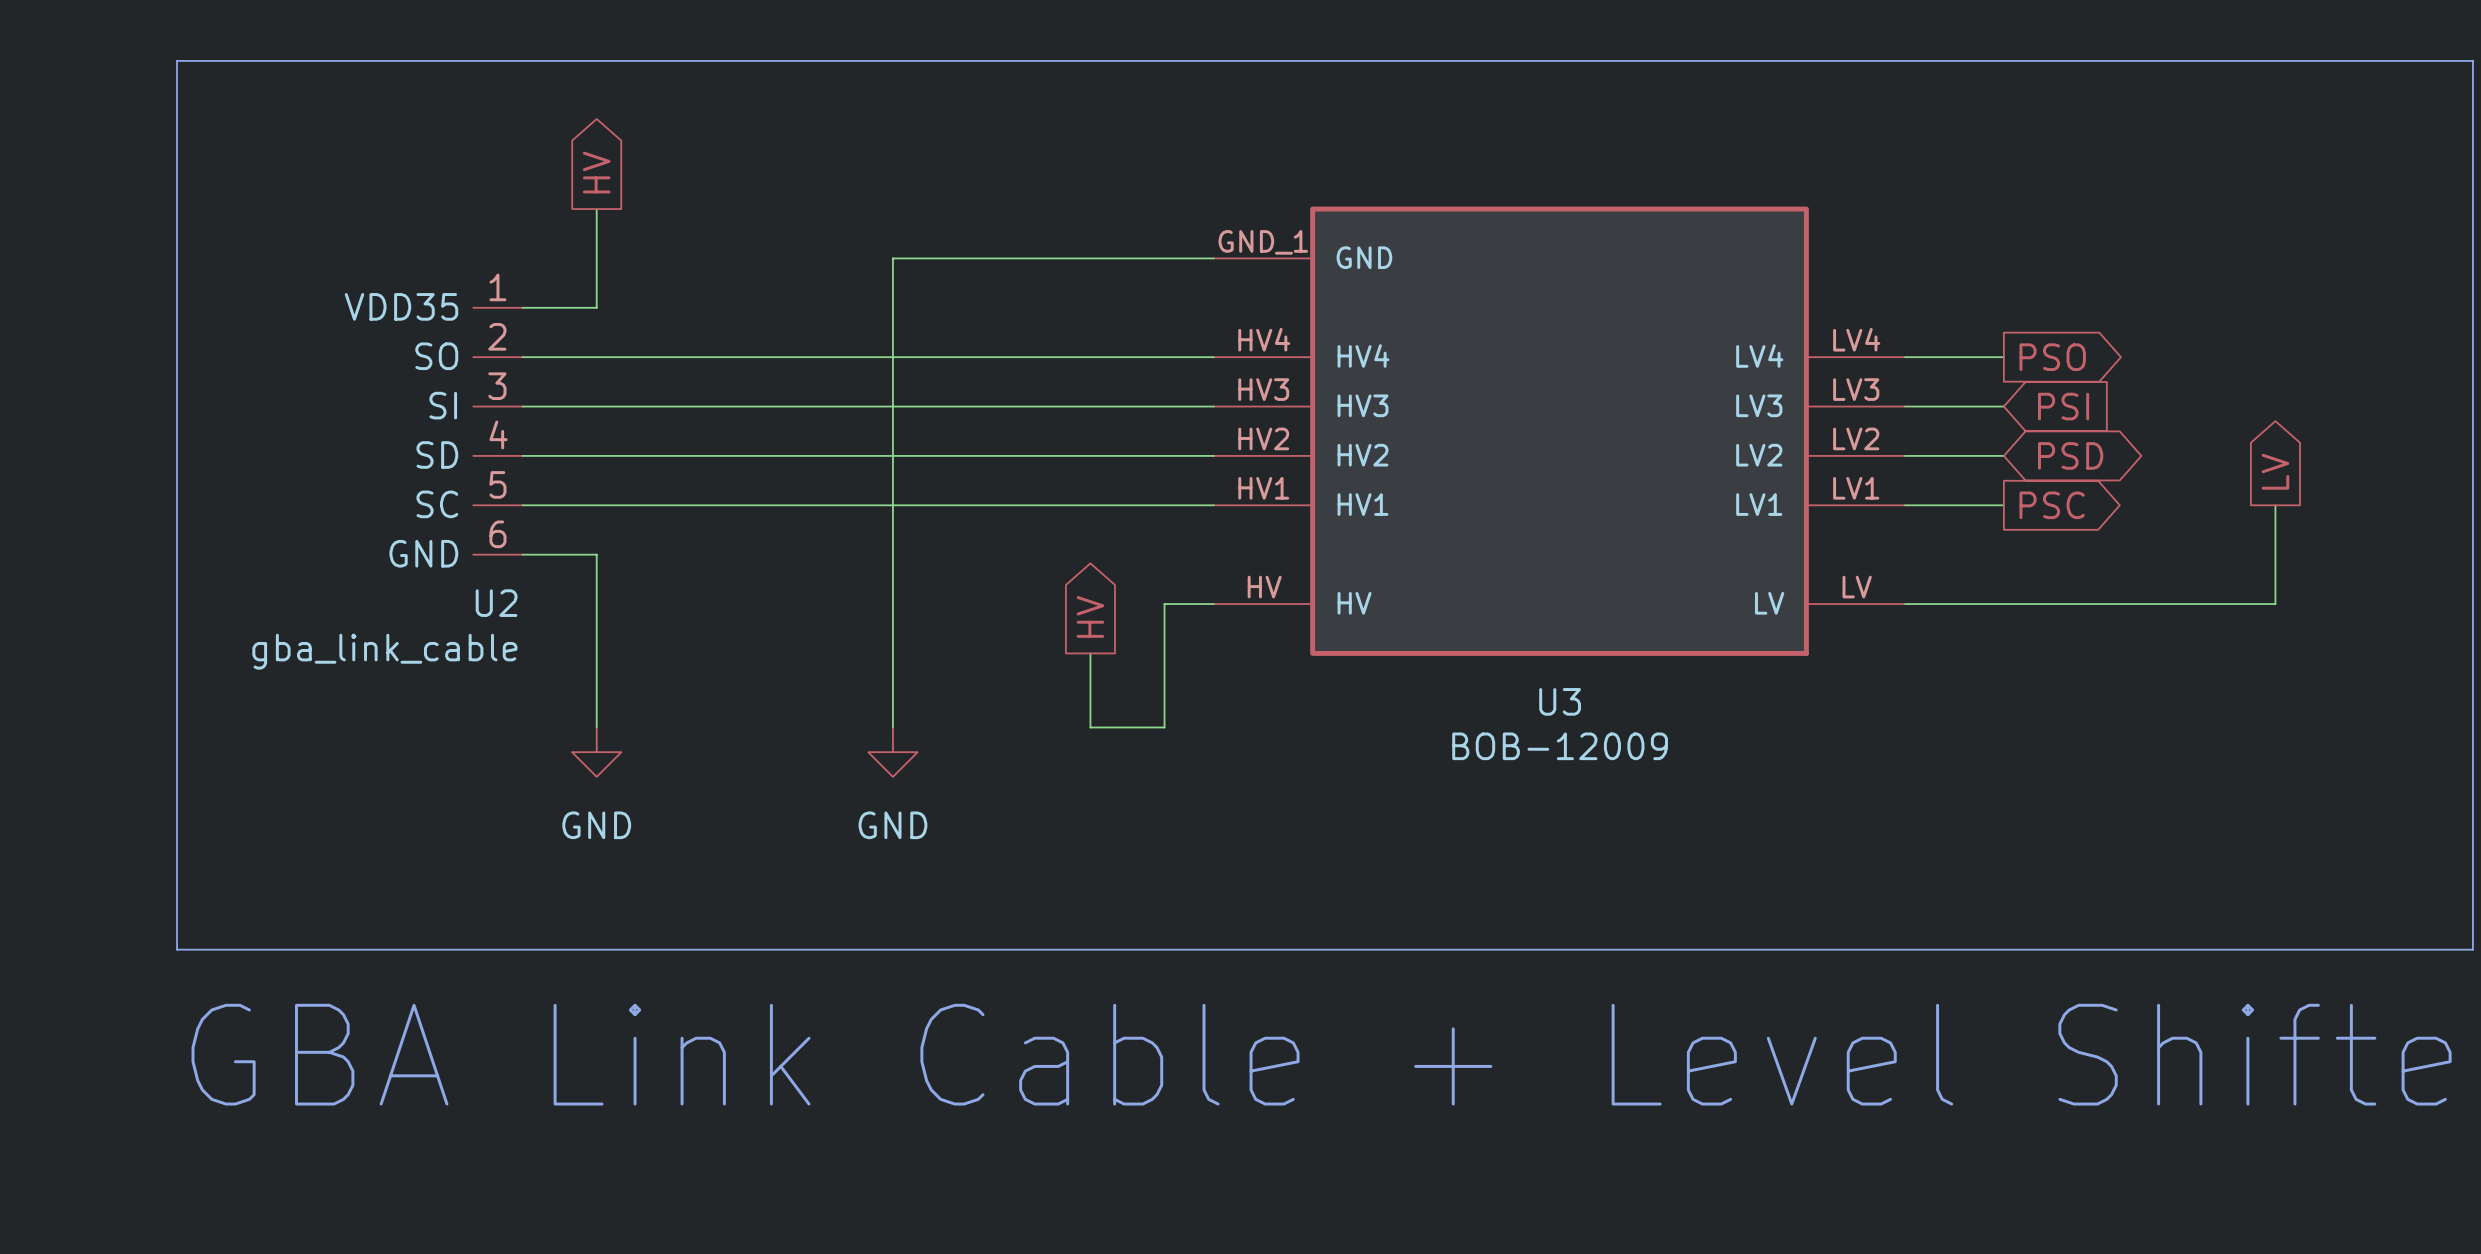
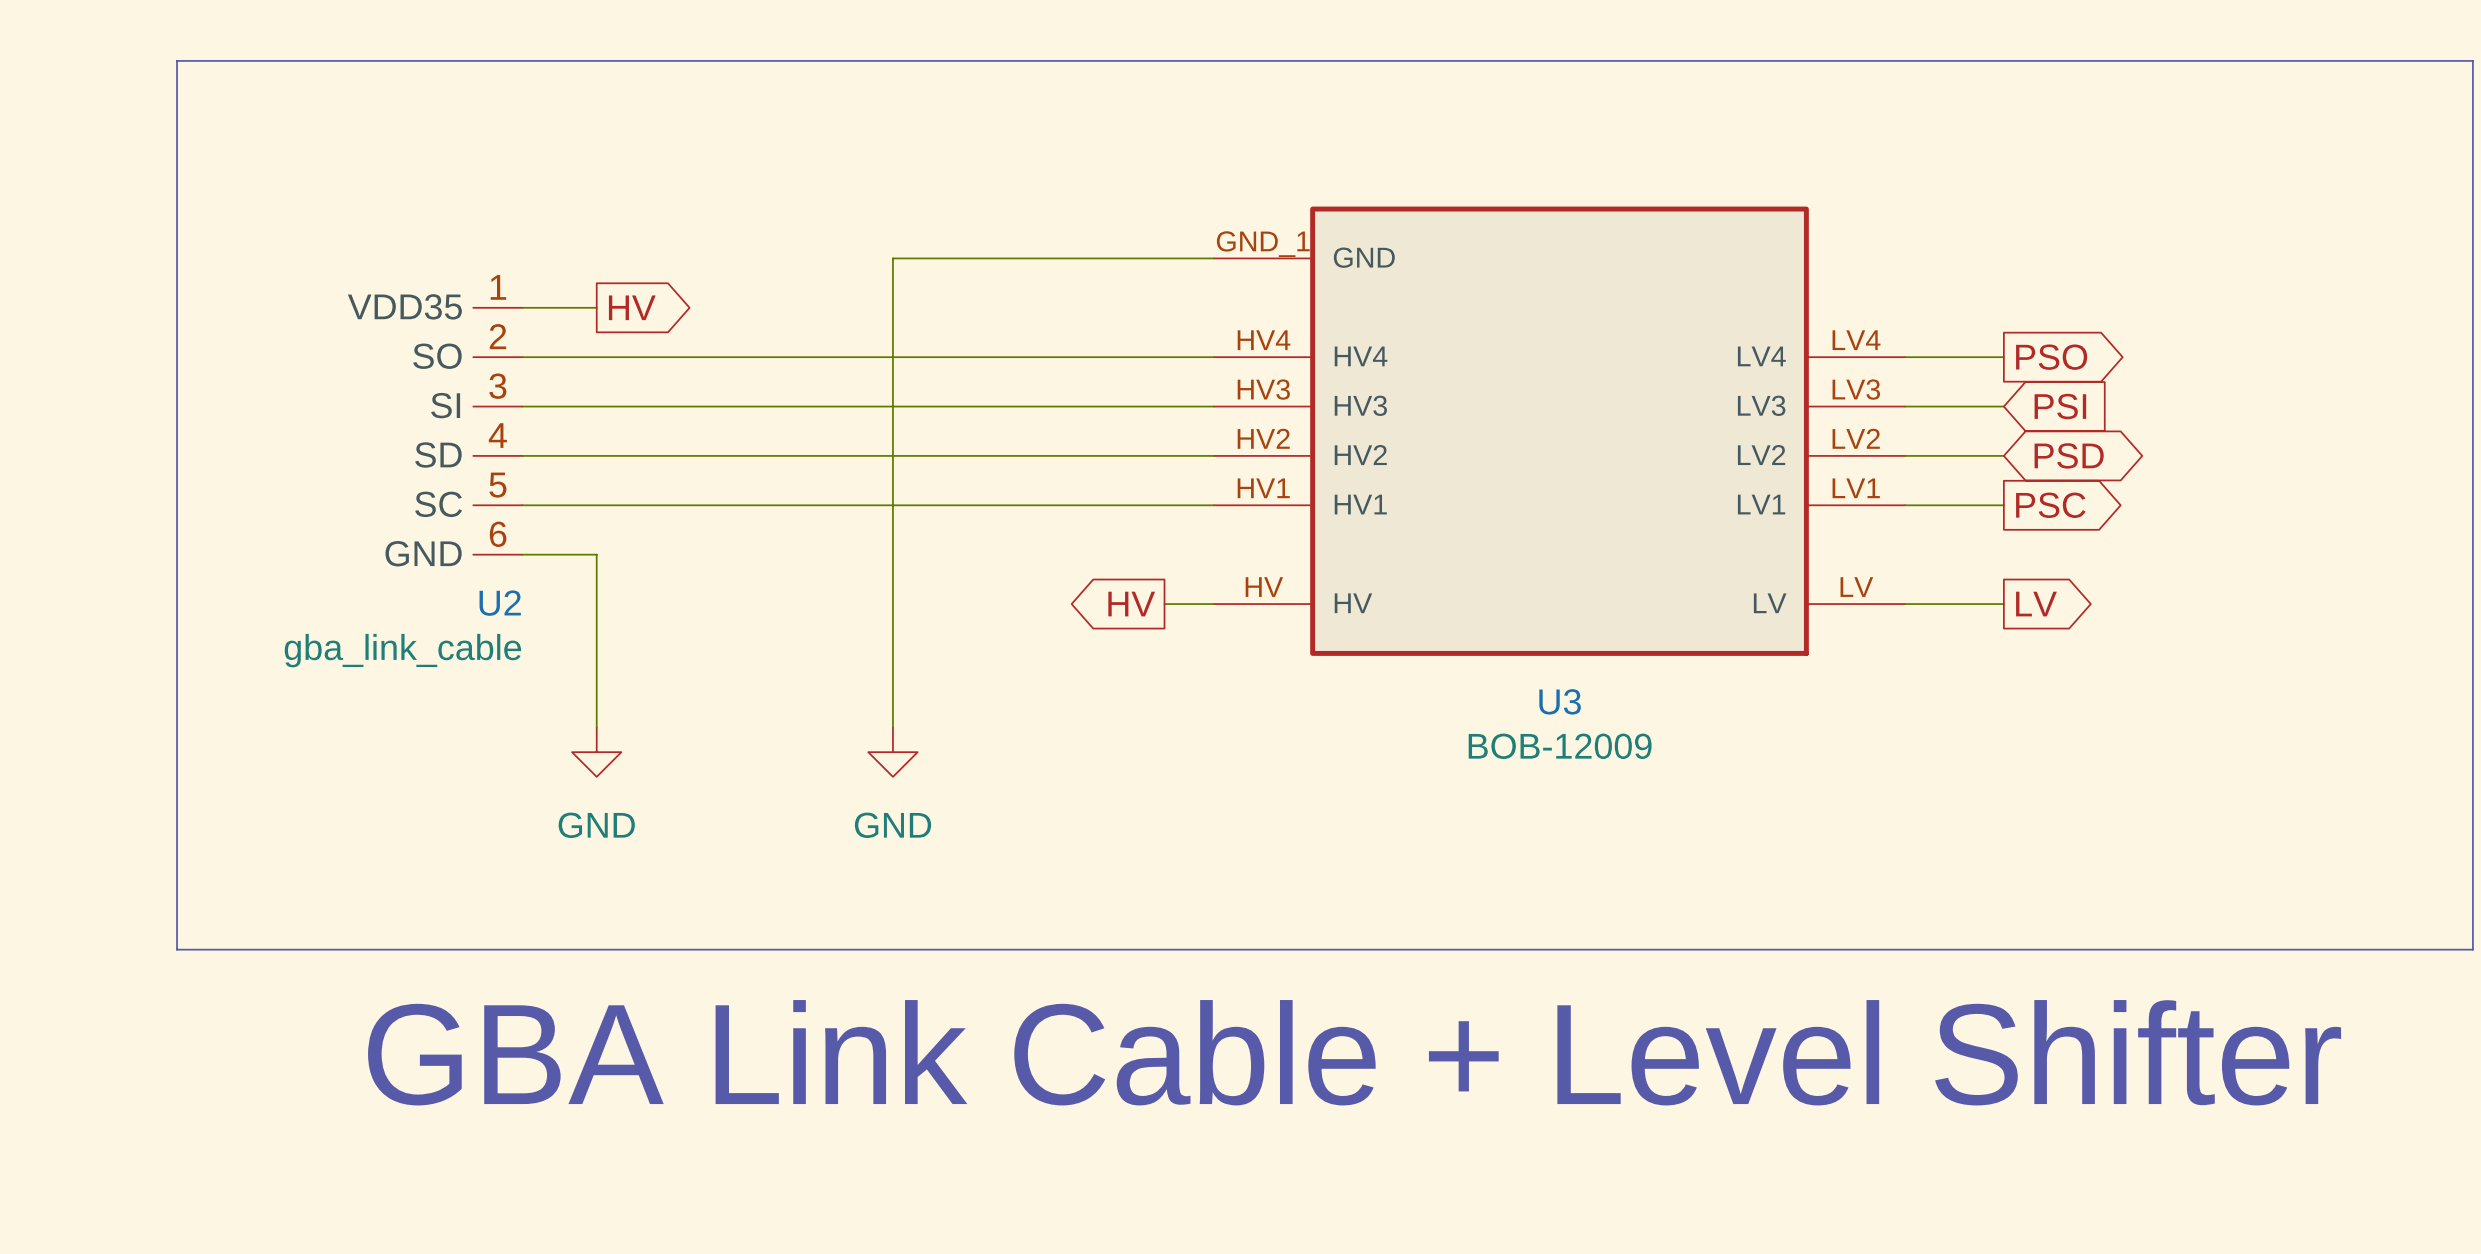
global label rotation: 0° (596, 172) -> 90° clockwise (632, 307)
global label position: HV (596, 172) -> HV (632, 307)
wire: (596, 209) (596, 307) -> none
global label rotation: 0° (2275, 471) -> 90° clockwise (2036, 604)
global label position: LV (2275, 471) -> LV (2036, 604)
wire: (2275, 505) (2275, 604) (2003, 604) -> none
wire: (1164, 604) (1164, 727) (1090, 727) (1090, 653) -> none
global label rotation: 0° (1090, 616) -> 90° counterclockwise (1131, 604)

